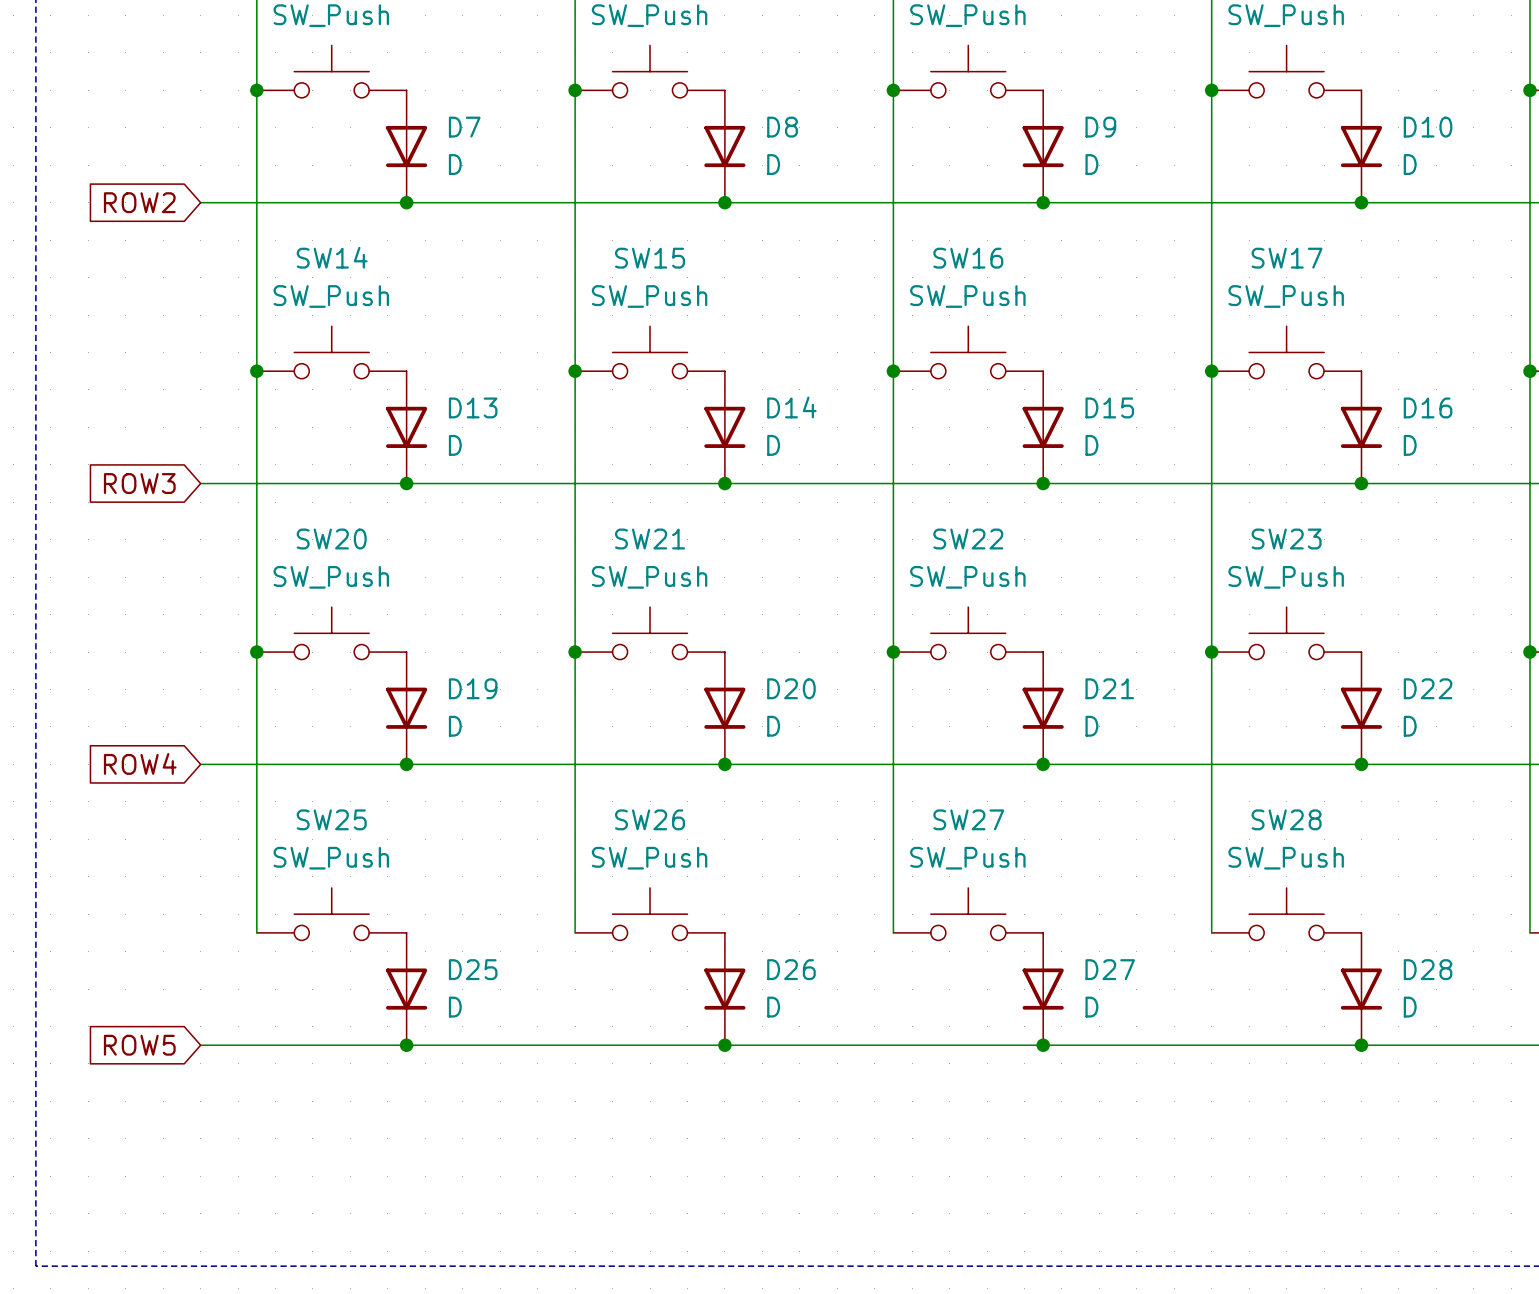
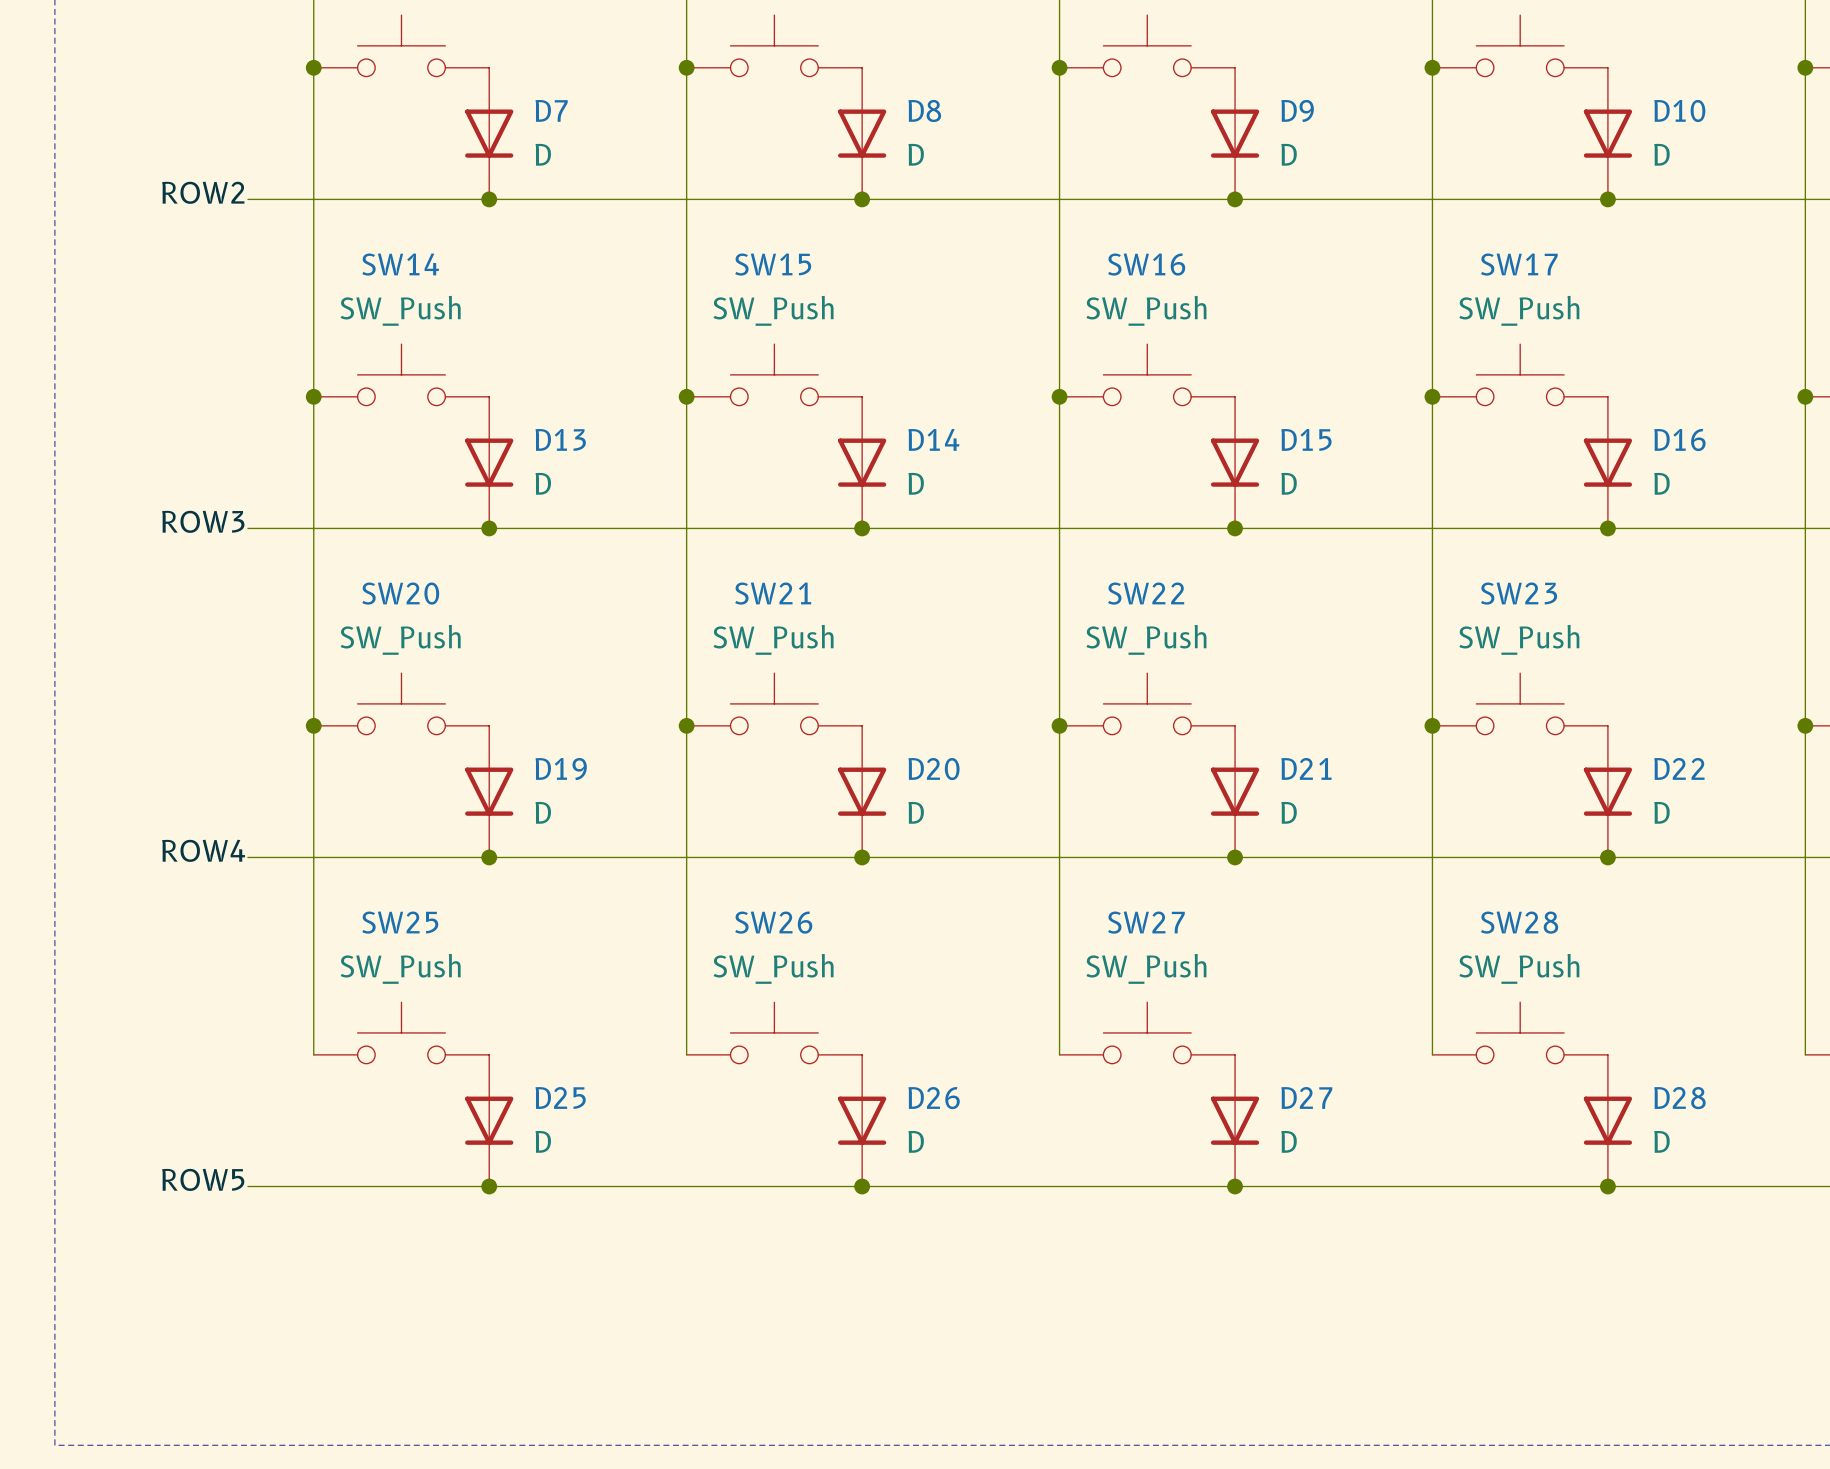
label: none -> ROW2 (203, 192)
global label: ROW2 (139, 202) -> none
label: none -> ROW3 (203, 521)
global label: ROW3 (139, 483) -> none
label: none -> ROW4 (203, 850)
global label: ROW4 (140, 763) -> none
label: none -> ROW5 (203, 1179)
global label: ROW5 (139, 1045) -> none

